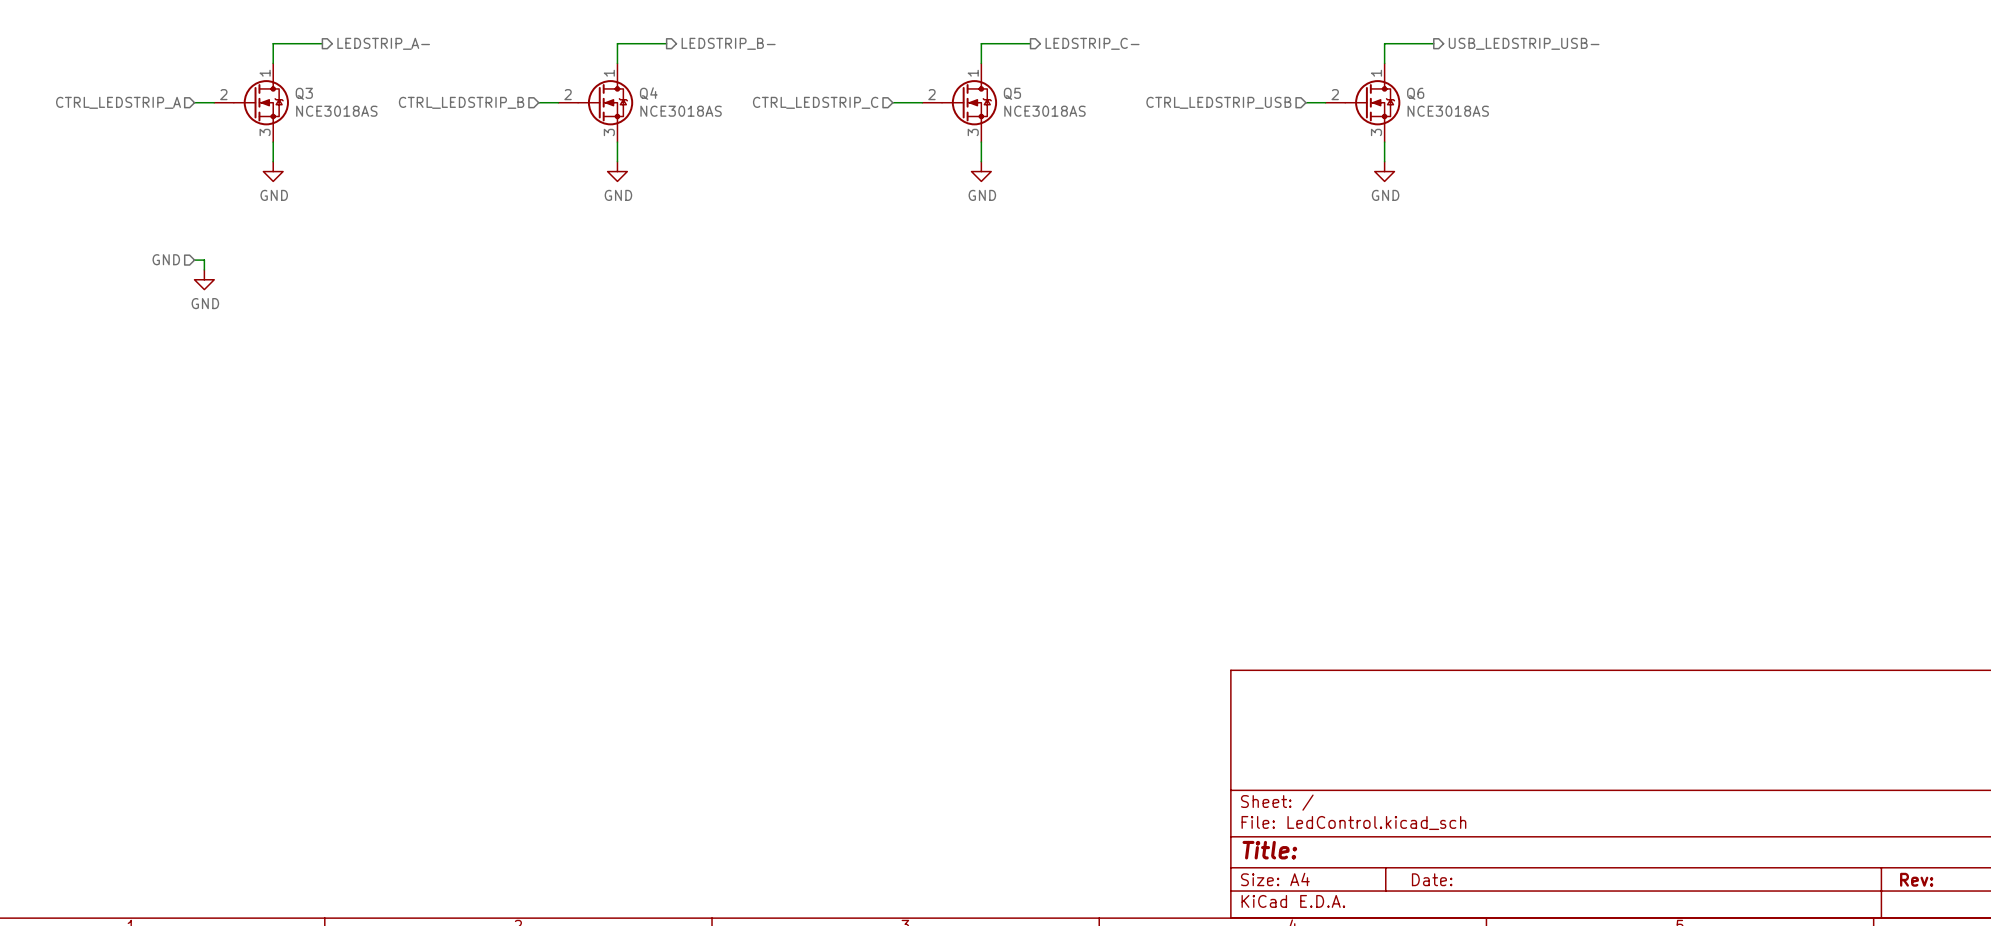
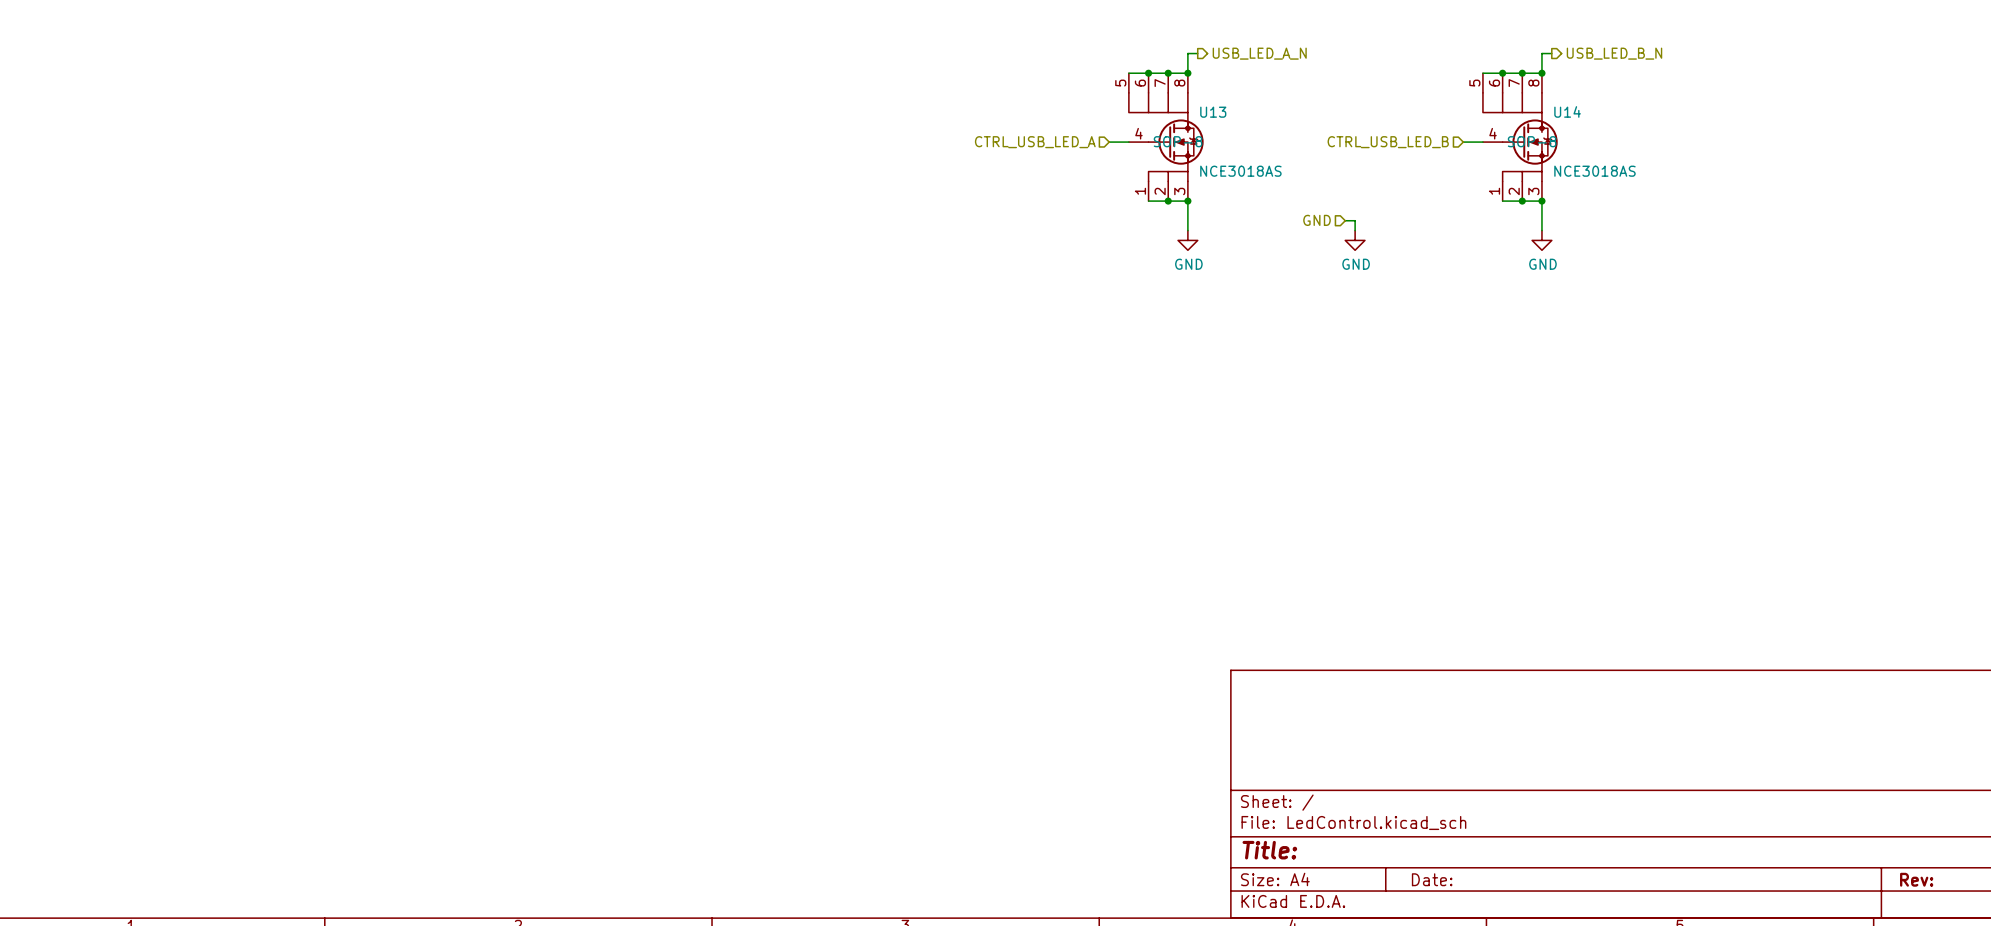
wire: (322, 43) (273, 43) (273, 63) -> none
hierarchical label: LEDSTRIP_A- (383, 43) -> none
wire: (666, 43) (617, 43) (617, 63) -> none
hierarchical label: LEDSTRIP_B- (728, 43) -> none
wire: (1030, 43) (981, 43) (981, 63) -> none
hierarchical label: LEDSTRIP_C- (1092, 43) -> none
wire: (1433, 43) (1384, 43) (1384, 63) -> none
hierarchical label: USB_LEDSTRIP_USB- (1524, 43) -> USB_LED_B_N (1614, 53)
wire: none -> (1197, 53) (1187, 53) (1187, 73) (1128, 73)
hierarchical label: none -> USB_LED_A_N (1259, 53)
wire: none -> (1551, 53) (1541, 53) (1541, 73) (1482, 73)
junction: none -> (1148, 73)
junction: none -> (1168, 73)
junction: none -> (1187, 73)
junction: none -> (1502, 73)
junction: none -> (1522, 73)
junction: none -> (1541, 73)
hierarchical label: CTRL_LEDSTRIP_A (118, 102) -> none
wire: (194, 102) (214, 102) -> none
Q3: NCE3018AS (251, 102) -> none
hierarchical label: CTRL_LEDSTRIP_B (461, 102) -> none
wire: (538, 102) (558, 102) -> none
Q4: NCE3018AS (595, 102) -> none
hierarchical label: CTRL_LEDSTRIP_C (815, 102) -> none
wire: (892, 102) (922, 102) -> none
Q5: NCE3018AS (959, 102) -> none
hierarchical label: CTRL_LEDSTRIP_USB (1218, 102) -> none
wire: (1305, 102) (1325, 102) -> (1463, 142) (1482, 142)
Q6: NCE3018AS (1362, 102) -> none
U13: none -> NCE3018AS (1166, 137)
U14: none -> NCE3018AS (1520, 137)
wire: (273, 142) (273, 161) -> none
wire: (617, 142) (617, 161) -> none
wire: (981, 142) (981, 161) -> none
hierarchical label: none -> CTRL_USB_LED_A (1035, 142)
wire: none -> (1109, 142) (1128, 142)
wire: (1384, 142) (1384, 161) -> none
hierarchical label: none -> CTRL_USB_LED_B (1388, 142)
power symbol: GND (273, 171) -> none
power symbol: GND (617, 171) -> none
power symbol: GND (981, 171) -> none
power symbol position: GND (1384, 171) -> GND (1355, 240)
wire: none -> (1148, 201) (1187, 201) (1187, 230)
junction: none -> (1168, 201)
junction: none -> (1187, 201)
wire: none -> (1502, 201) (1541, 201) (1541, 230)
junction: none -> (1522, 201)
junction: none -> (1541, 201)
hierarchical label: none -> GND (1317, 220)
wire: none -> (1345, 220) (1355, 220) (1355, 230)
power symbol: none -> GND (1187, 240)
power symbol: none -> GND (1541, 240)
hierarchical label: GND (166, 259) -> none
wire: (194, 260) (204, 260) (204, 269) -> none
power symbol: GND (204, 279) -> none

